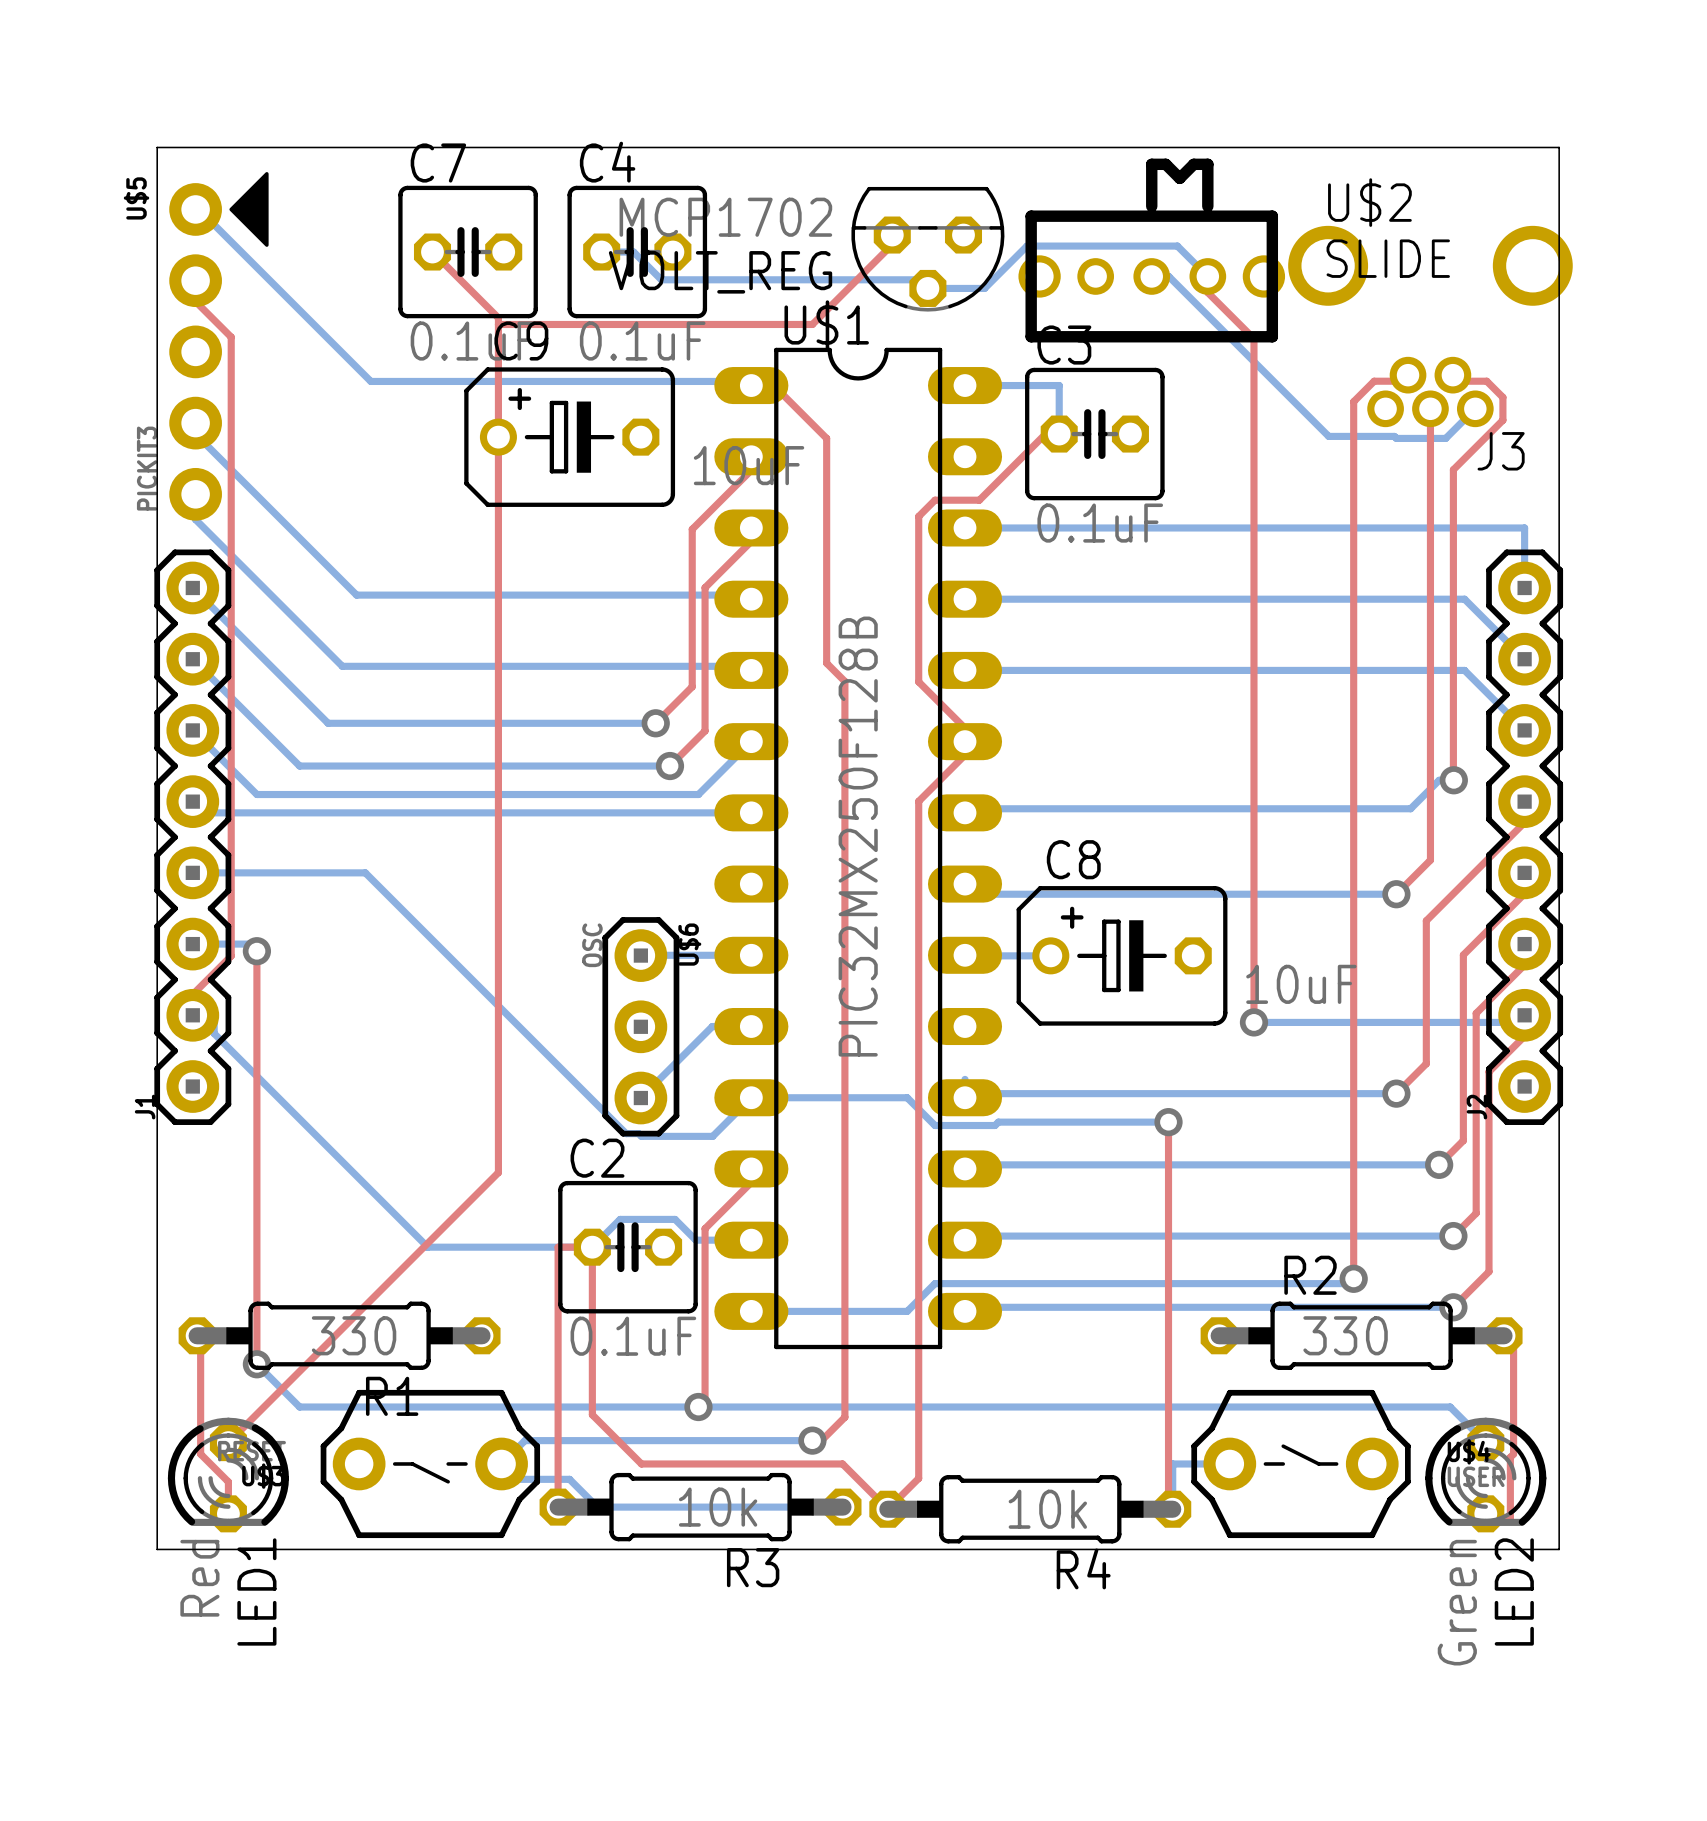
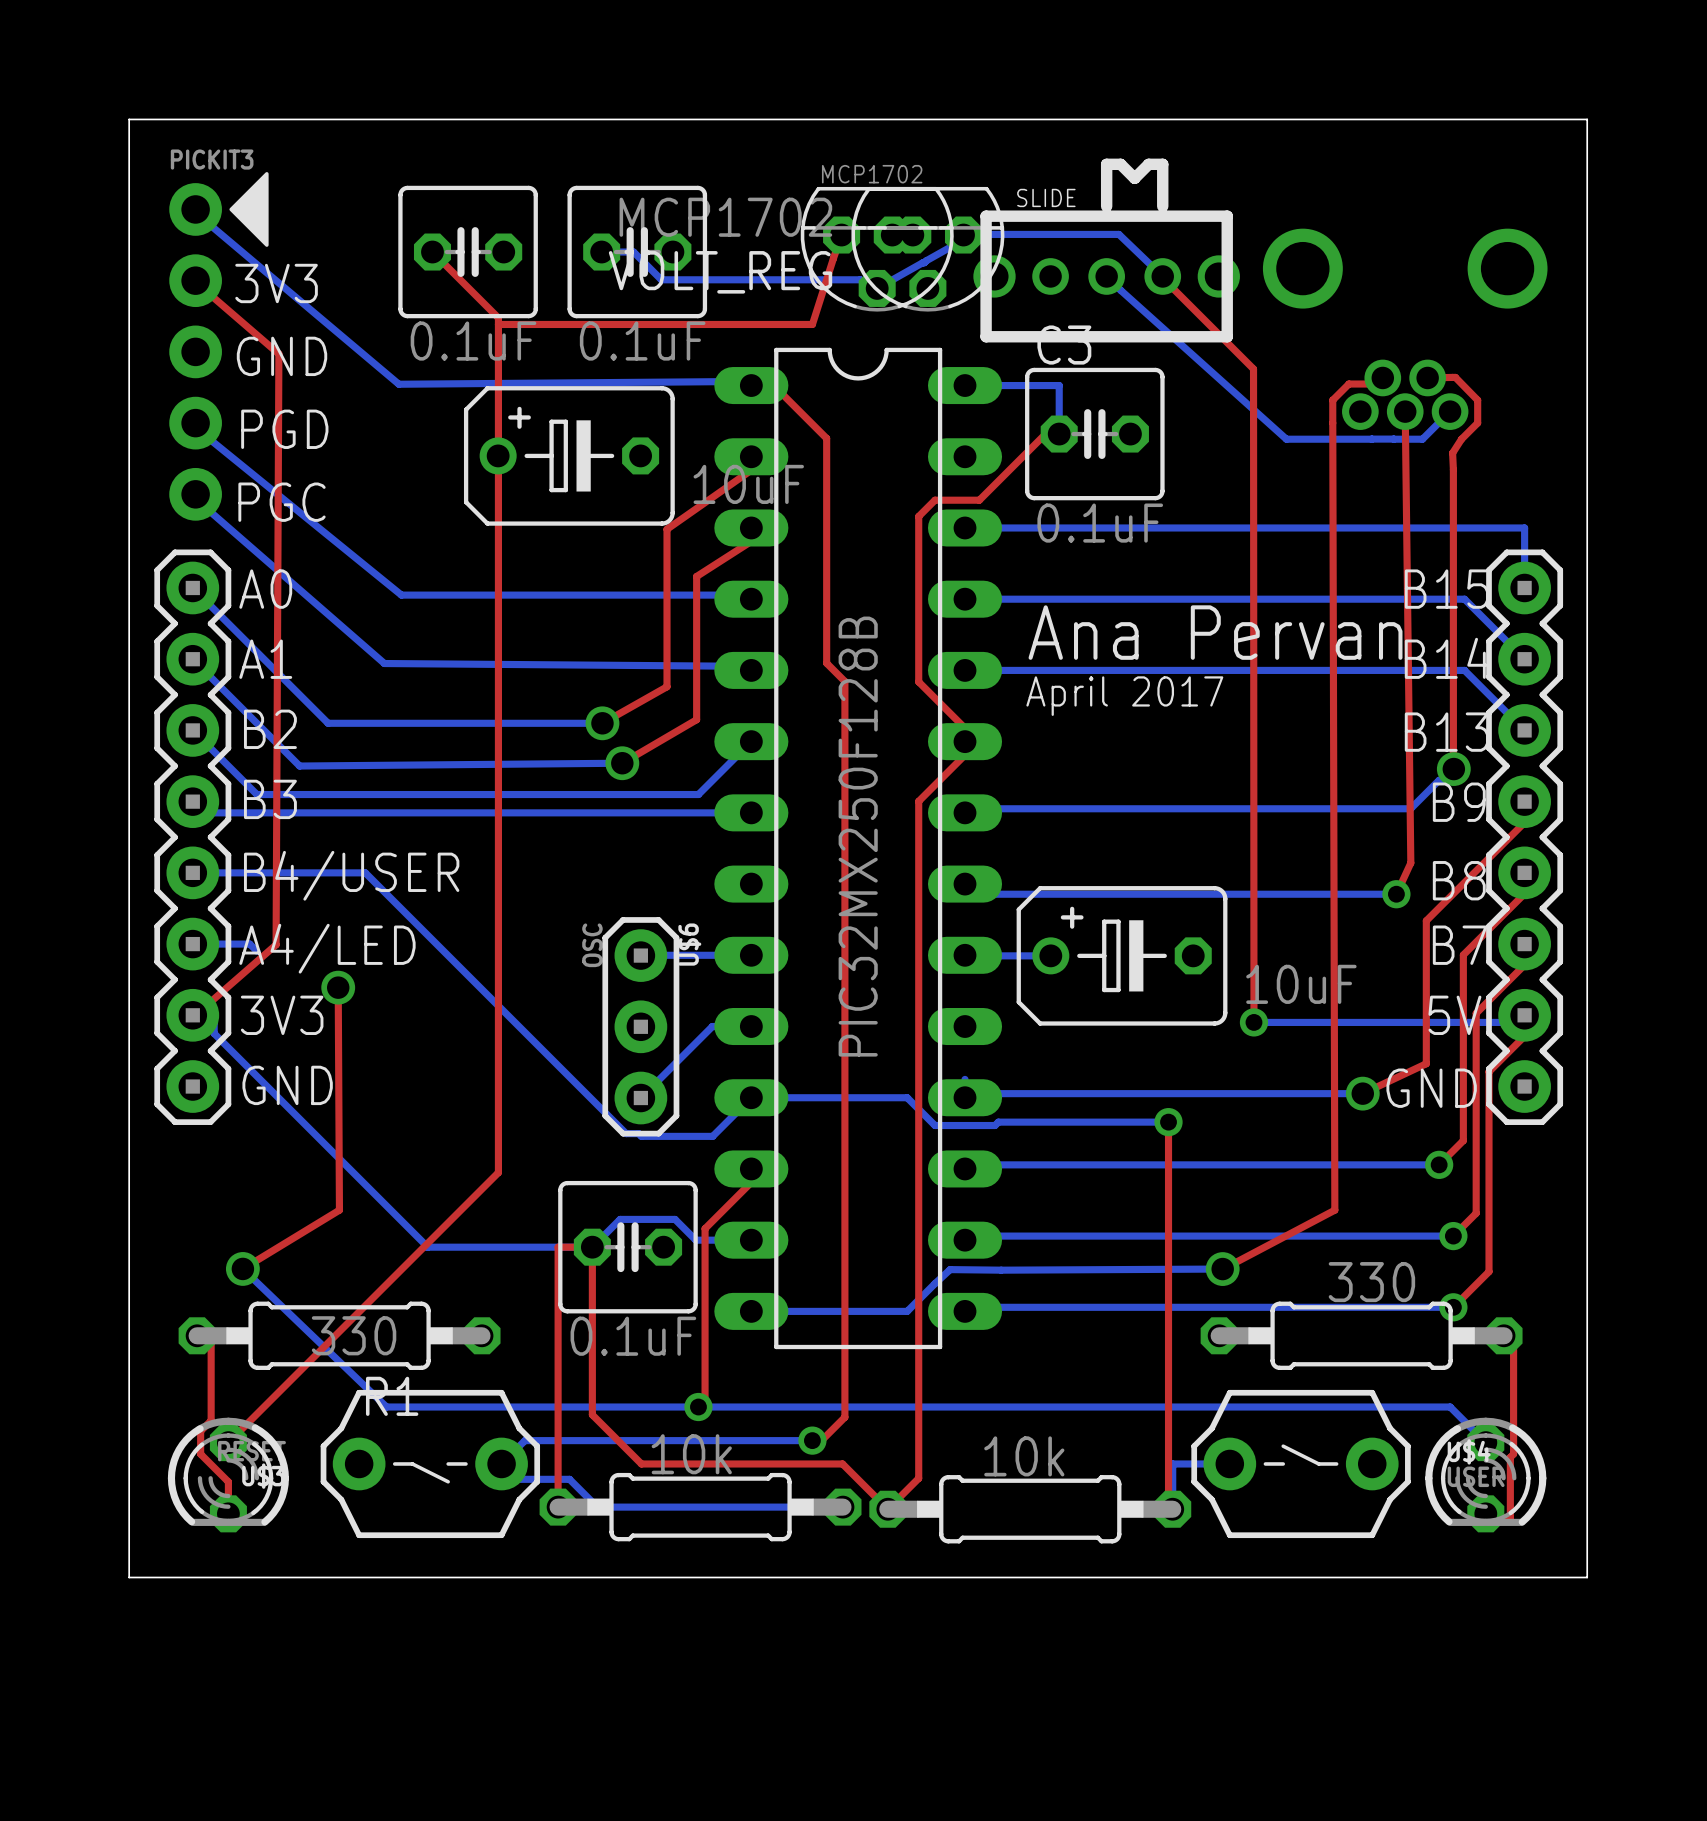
board edge: (157, 147) (1559, 147) (1559, 1549) (157, 1549) (157, 147) -> (129, 119) (129, 1577) (1587, 1577) (1587, 119) (129, 119)
C7 name: C7 (438, 162) -> none
C4 name: C4 (607, 162) -> none
U$5 name: U$5 (136, 198) -> none
bottom track: (195, 209) (198, 209) (370, 381) (747, 381) -> (196, 212) (398, 384) (747, 381)
top track: (892, 235) (892, 244) (812, 324) -> (841, 235) (812, 324)
part: none -> MCP1702 (877, 249)
part: none -> SLIDE (1106, 250)
U$2: SLIDE (1151, 250) -> none
bottom track: none -> (1106, 276) (1286, 439) (1422, 439) (1450, 411)
bottom track: (1151, 276) (1168, 276) (1328, 436) (1445, 438) (1475, 408) -> none
bottom track: (1207, 276) (1177, 246) (1027, 246) (984, 288) (927, 288) (919, 279) (860, 279) -> (1162, 276) (1118, 234) (973, 234) (877, 288) (860, 279)
top track: (1207, 276) (1207, 292) (1253, 338) (1253, 1022) -> (1162, 276) (1253, 369) (1253, 1022)
top track: (195, 280) (195, 301) (231, 337) (231, 956) (192, 994) (192, 1015) -> (196, 283) (278, 353) (276, 944) (192, 1015)
text: none -> 3V3 (276, 283)
U$1 name: U$1 (826, 325) -> none
J3 position: (1430, 326) -> (1405, 329)
C9 name: C9 (521, 340) -> none
text: none -> GND (282, 356)
top track: (1408, 375) (1401, 381) (1374, 381) (1353, 401) (1353, 1278) -> none
top track: (1452, 375) (1458, 381) (1486, 381) (1502, 397) (1502, 420) (1453, 469) -> (1427, 377) (1455, 377) (1477, 400) (1477, 423) (1461, 439) (1452, 453) (1453, 469)
top track: none -> (1382, 377) (1373, 385) (1371, 384) (1348, 384) (1332, 400) (1334, 1210) (1222, 1269)
top track: (1430, 408) (1430, 860) (1396, 894) -> (1405, 411) (1410, 862) (1396, 894)
bottom track: (195, 423) (195, 434) (356, 595) (401, 595) -> (196, 425) (206, 436) (401, 595)
text: none -> PGD (284, 429)
C9 position: (569, 437) -> (569, 455)
J3 name: J3 (1501, 451) -> none
U$5 value rotation: 0° (147, 468) -> 90° clockwise (212, 159)
U$5 value position: PICKIT3 (147, 468) -> PICKIT3 (212, 159)
top track: (751, 470) (692, 529) (692, 686) (655, 723) -> (751, 470) (667, 529) (667, 686) (602, 723)
bottom track: (195, 494) (195, 519) (342, 666) (747, 666) -> (196, 497) (209, 511) (384, 663) (747, 666)
text: none -> PGC (282, 502)
top track: (751, 541) (705, 587) (705, 730) (669, 766) -> (751, 541) (696, 576) (696, 719) (622, 763)
text: none -> A0 (265, 589)
text: none -> B15 (1446, 589)
text: none -> Ana Pervan (1215, 632)
text: none -> B14 (1447, 658)
text: none -> A1 (265, 659)
text: none -> April 2017 (1124, 696)
bottom track: (602, 723) (655, 723) -> none
via: none -> (602, 723)
via: (655, 723) -> none
text: none -> B2 (270, 729)
text: none -> B13 (1446, 732)
via: none -> (622, 763)
bottom track: (299, 766) (669, 766) -> (299, 766) (622, 763)
via: (669, 766) -> none
via size: [1439, 766, 1468, 795] -> [1436, 752, 1471, 786]
text: none -> B3 (270, 799)
text: none -> B9 (1459, 802)
C8 name: C8 (1073, 859) -> none
text: none -> B4/USER (351, 875)
text: none -> B8 (1459, 880)
text: none -> B7 (1460, 945)
text: none -> A4/LED (327, 948)
top track: (256, 951) (256, 1364) -> none
via: (256, 951) -> none
top track: none -> (338, 987) (339, 1210) (242, 1268)
via: none -> (338, 987)
text: none -> 3V3 (282, 1015)
text: none -> 5V (1454, 1015)
top track: (1426, 1063) (1396, 1093) -> (1426, 1063) (1362, 1093)
text: none -> GND (287, 1085)
text: none -> GND (1431, 1088)
bottom track: (1362, 1093) (1396, 1093) -> none
via: none -> (1362, 1093)
via: (1396, 1093) -> none
J1 name: J1 (145, 1107) -> none
J2 name: J2 (1476, 1107) -> none
C2 name: C2 (597, 1158) -> none
via: none -> (242, 1268)
via: none -> (1222, 1269)
R2 name: R2 (1310, 1275) -> none
bottom track: (1353, 1278) (1348, 1283) (934, 1283) -> (1222, 1269) (950, 1269) (934, 1283)
via: (1353, 1278) -> none
top track: (197, 1335) (200, 1339) (200, 1431) -> (211, 1335) (211, 1420) (200, 1431)
R2 value position: 330 (1345, 1335) -> 330 (1371, 1282)
bottom track: (256, 1364) (299, 1407) (386, 1407) -> (242, 1268) (386, 1407)
via: (256, 1364) -> none
R3 value position: 10k (718, 1507) -> 10k (691, 1454)
R4 value position: 10k (1047, 1509) -> 10k (1024, 1456)
R3 name: R3 (753, 1567) -> none
R4 name: R4 (1083, 1568) -> none
LED1 value: Red (199, 1578) -> none
LED1 name: LED1 (256, 1591) -> none
LED2 name: LED2 (1514, 1591) -> none
LED2 value: Green (1457, 1602) -> none

